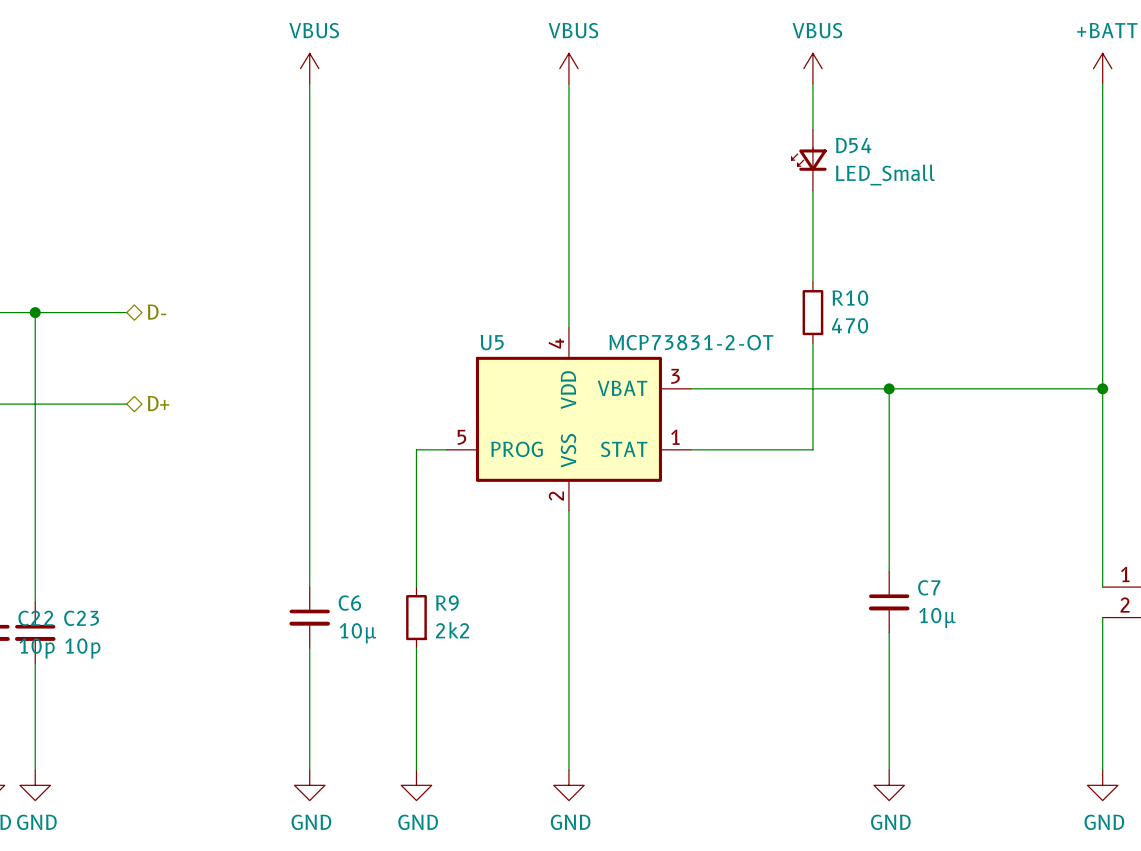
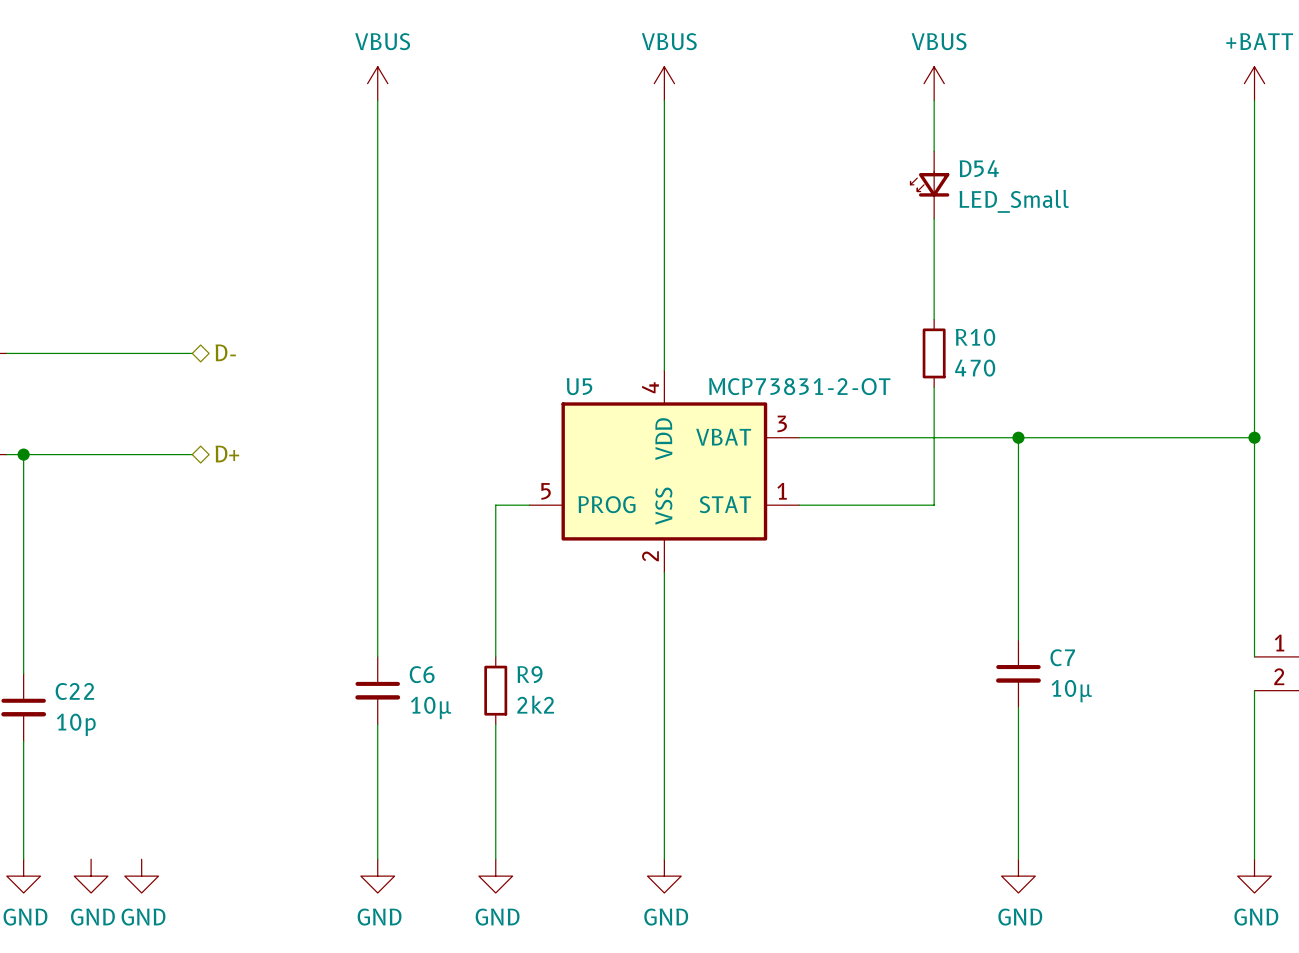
wire: (35, 312) (35, 602) -> none
junction: (35, 312) -> none
wire: none -> (175, 353) (192, 353)
hierarchical label position: D- (156, 312) -> D- (225, 352)
hierarchical label position: D+ (158, 403) -> D+ (227, 454)
wire: none -> (175, 454) (192, 454)
C23: 10p (35, 632) -> none
wire: (35, 663) (35, 770) -> none
power symbol position: GND (35, 785) -> GND (91, 876)
power symbol: none -> GND (141, 876)

